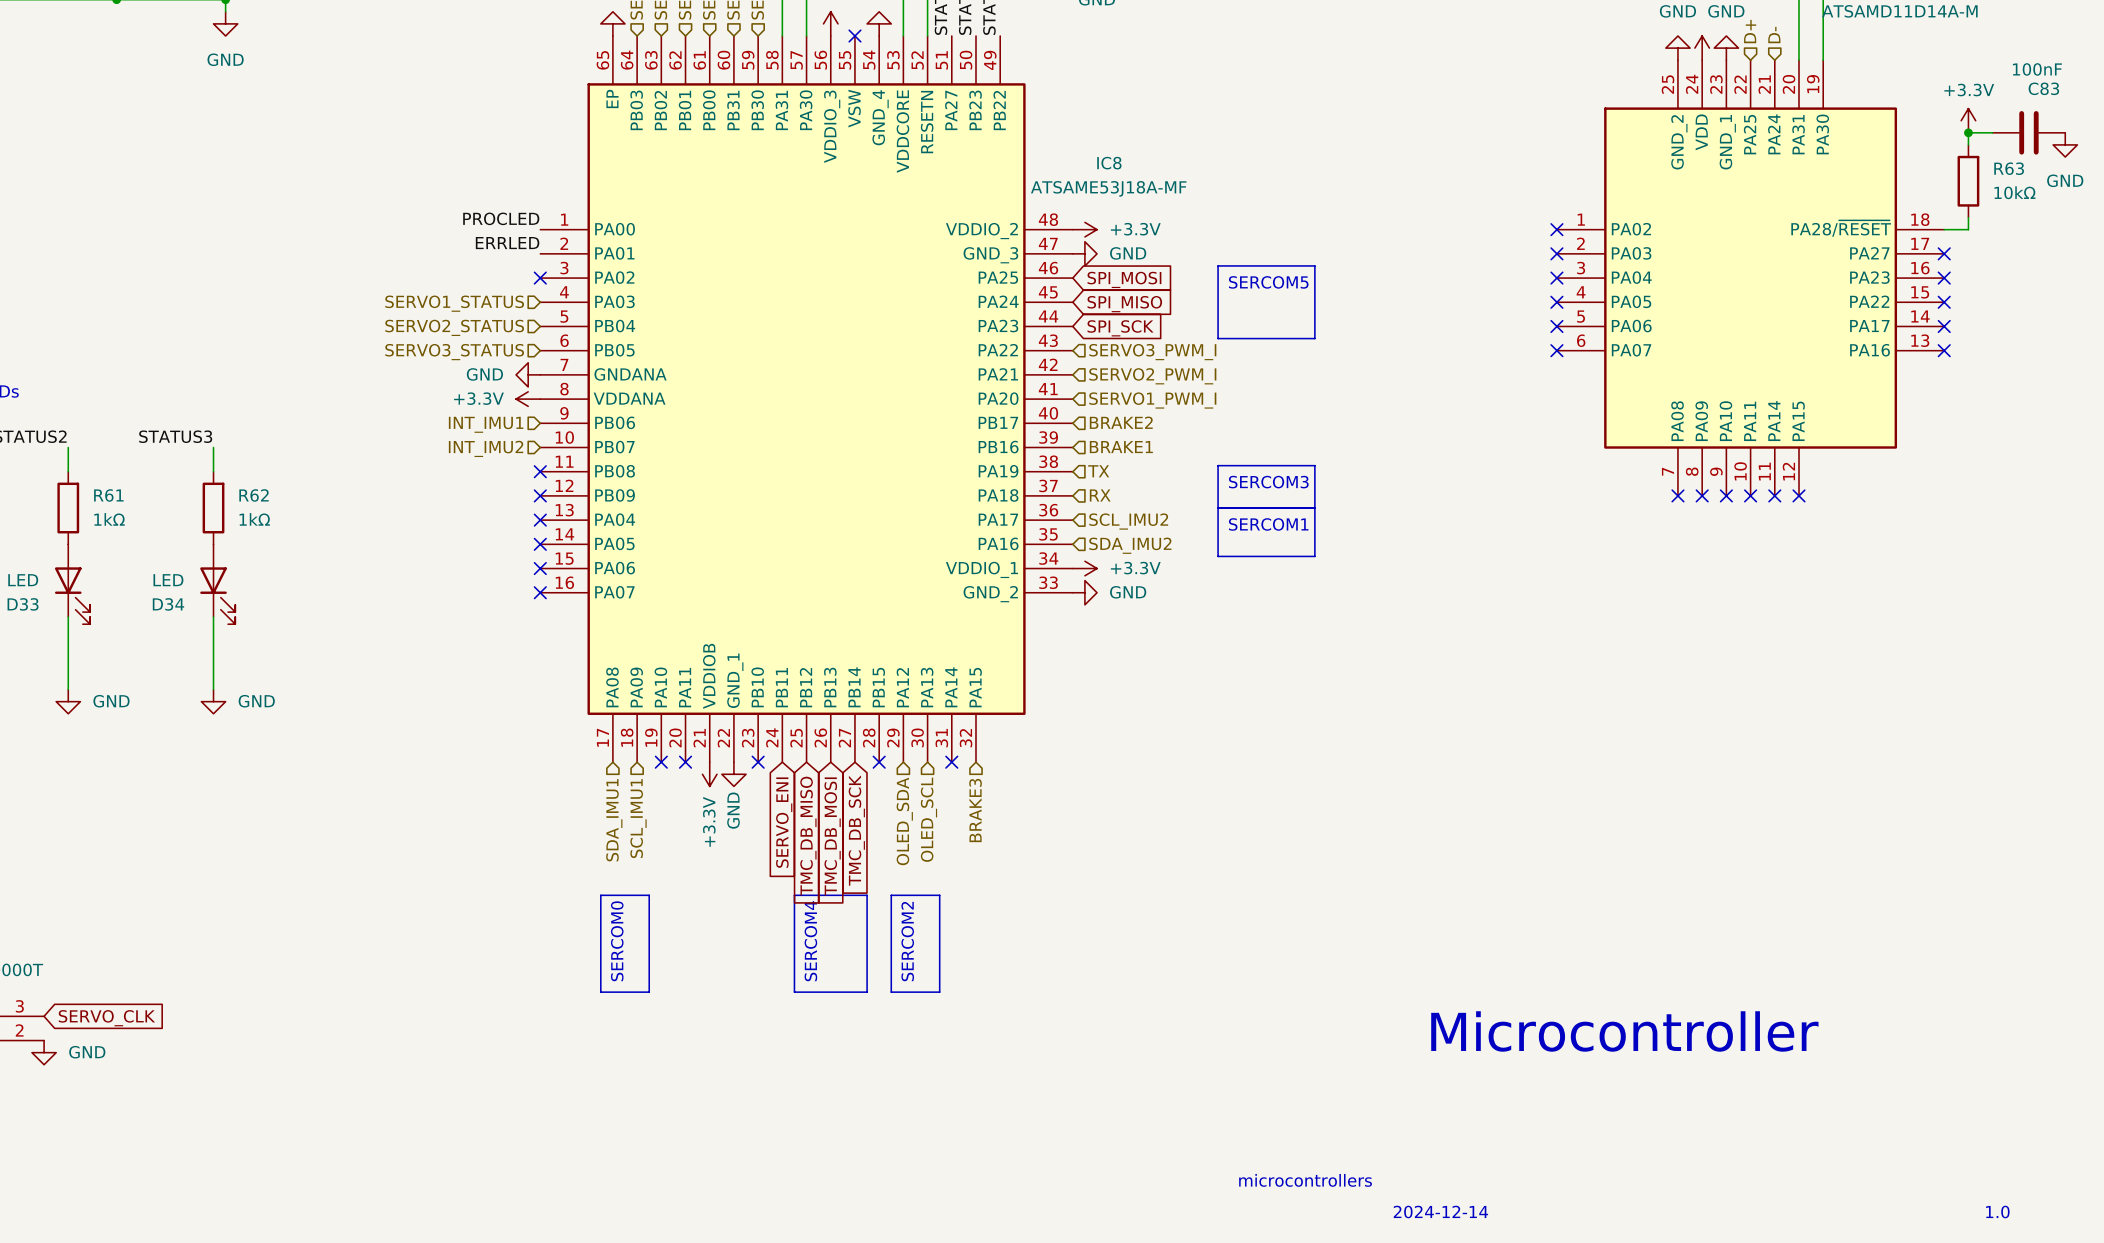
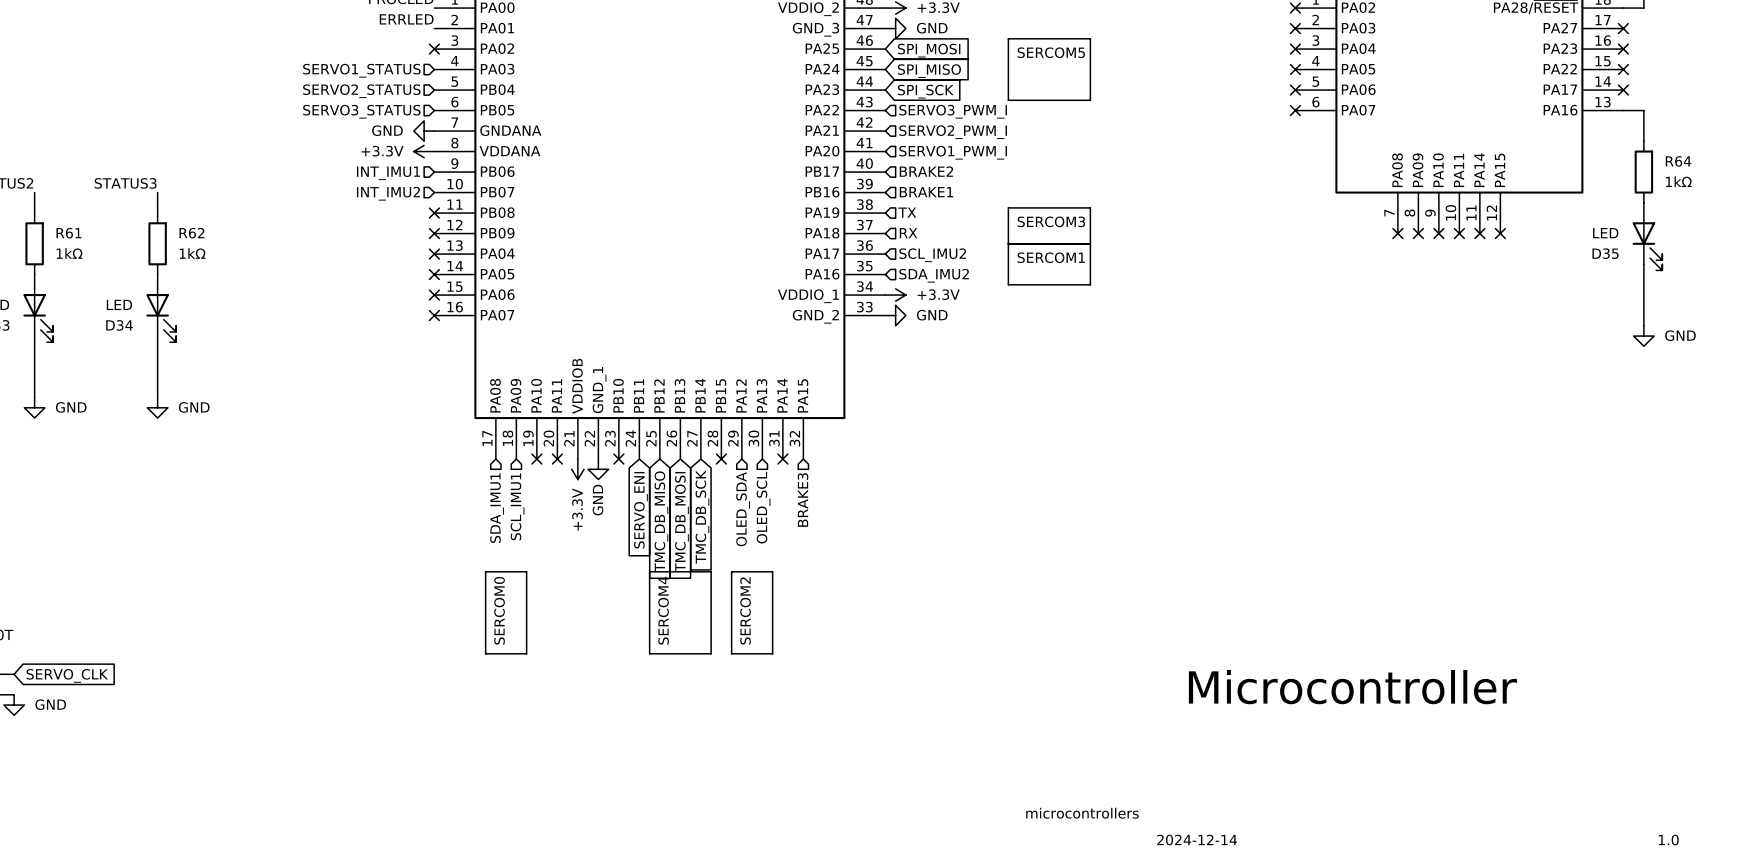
wire: none -> (1623, 110) (1643, 110) (1643, 141)
no-connect mark: (1944, 350) -> none
R64: none -> 1kΩ (1643, 172)
D35: none -> LED (1647, 236)
wire: none -> (1643, 264) (1643, 325)
power symbol: none -> GND (1643, 336)

